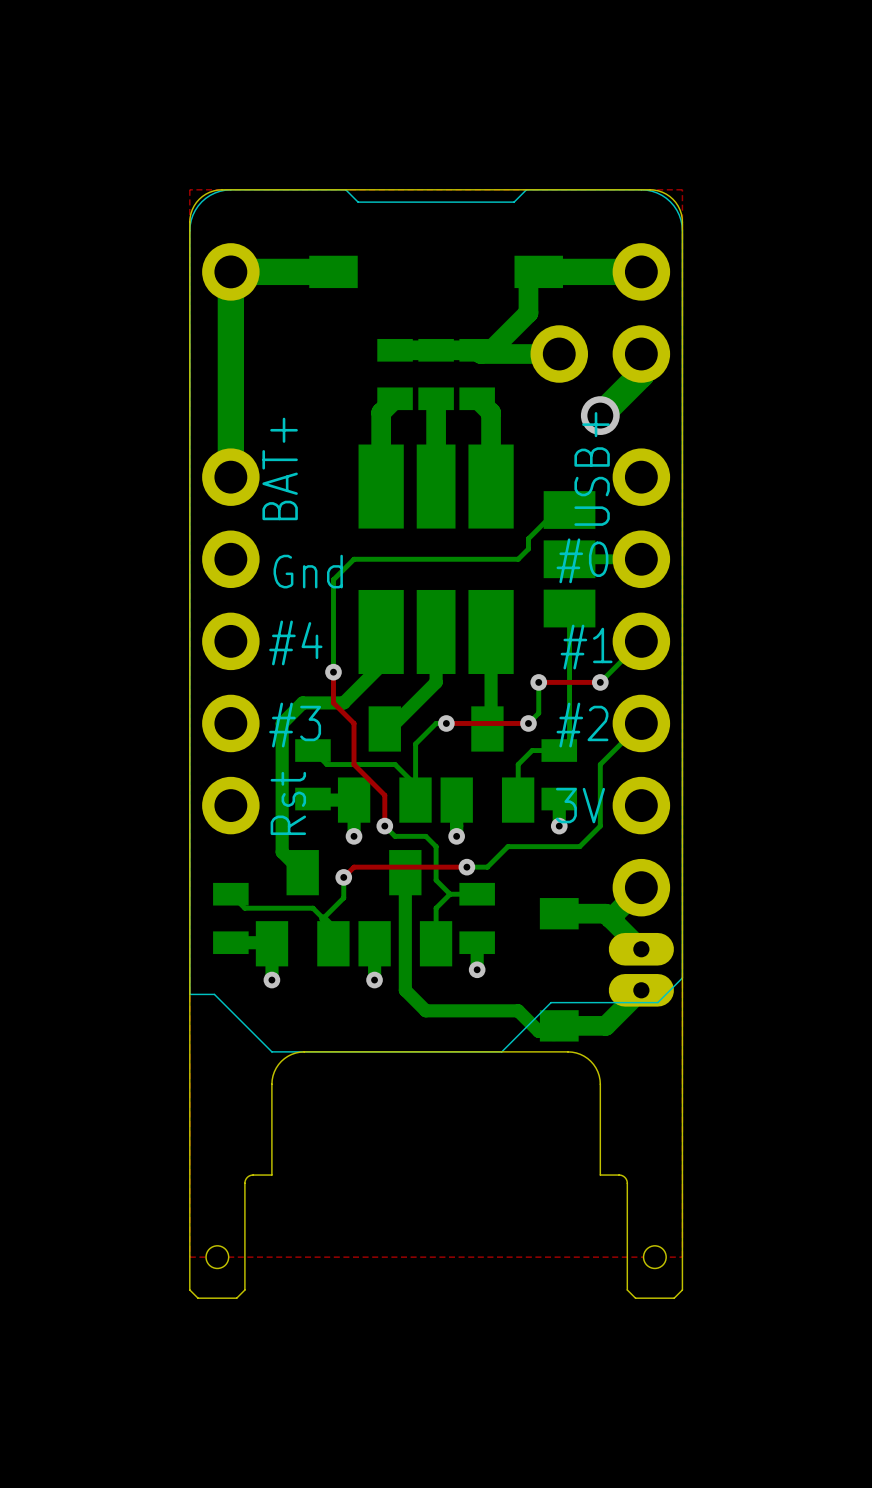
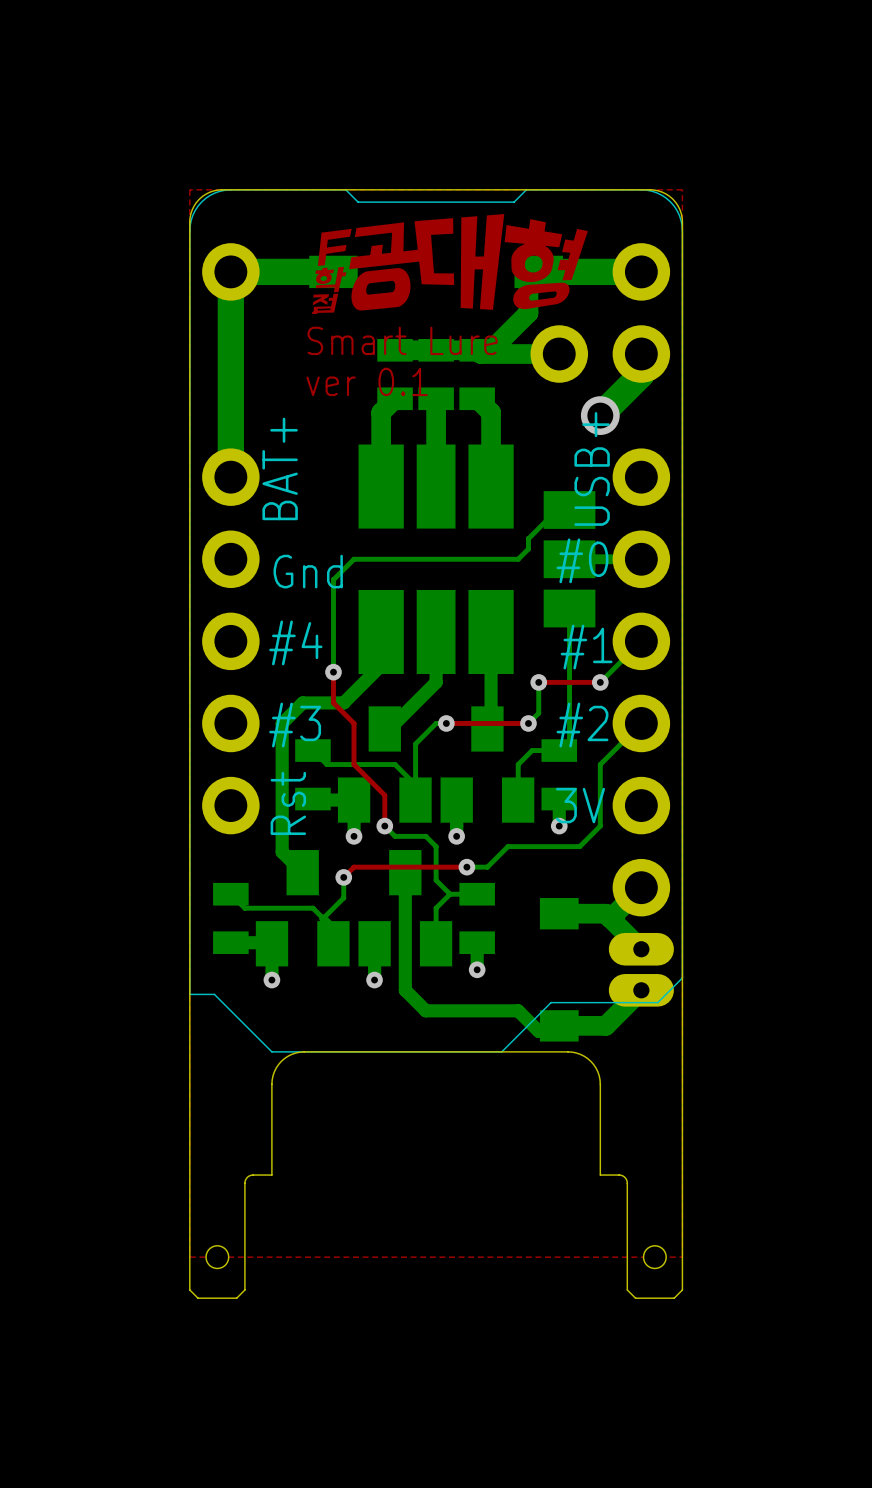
drawing: none -> [312, 214, 588, 313]
text: none -> Smart Lure (402, 340)
text: none -> ver 0.1 (367, 381)

